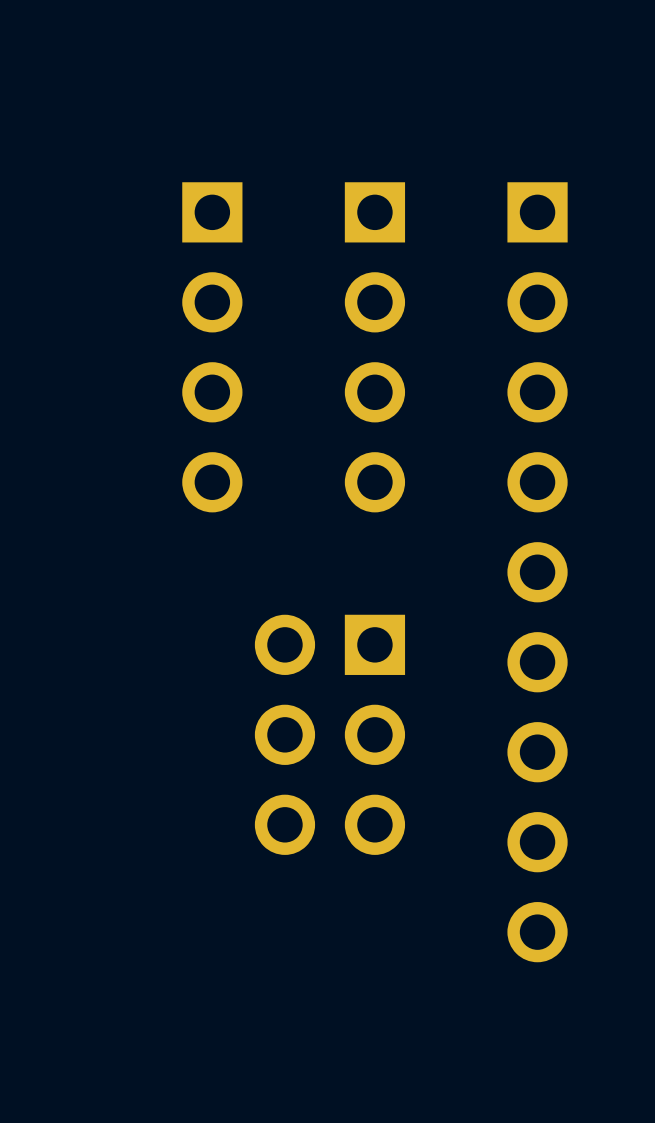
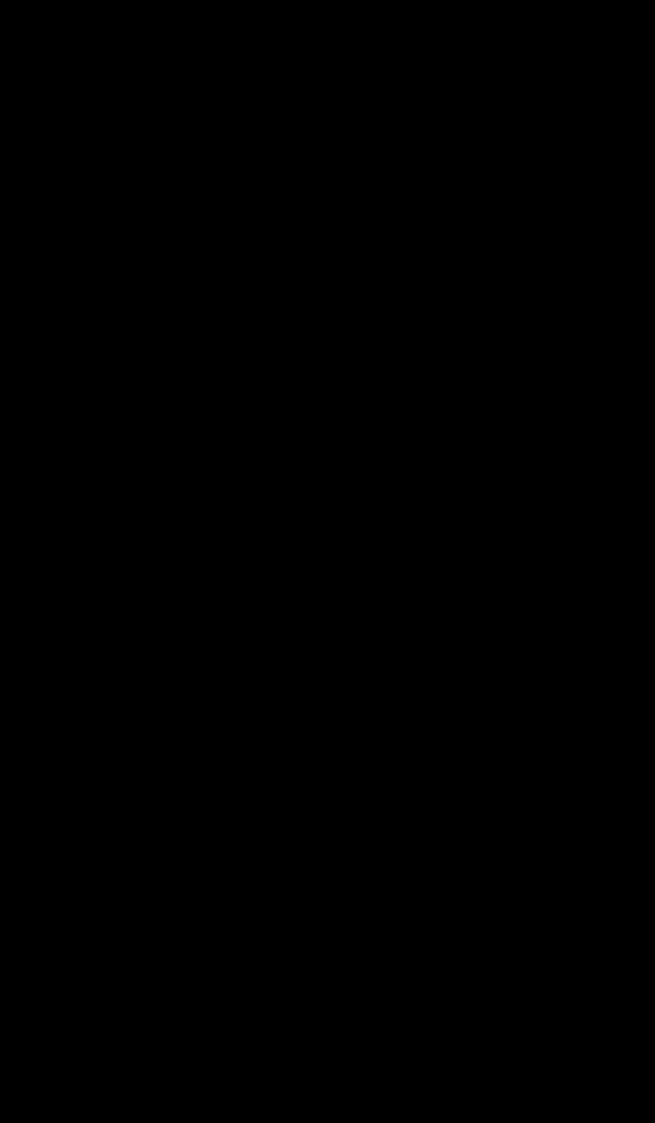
part: (212, 347) -> none
part: (374, 347) -> none
part: (537, 572) -> none
part: (329, 734) -> none

